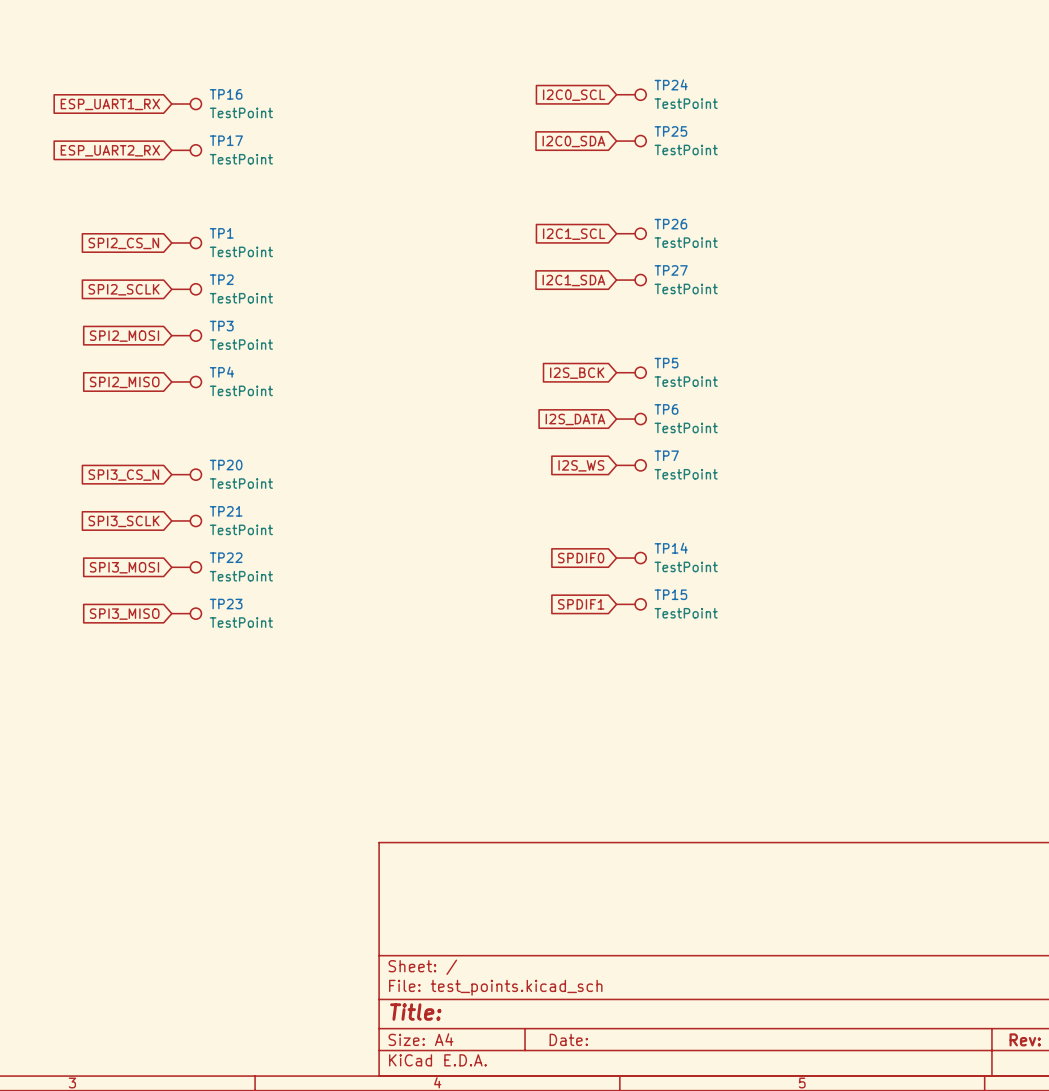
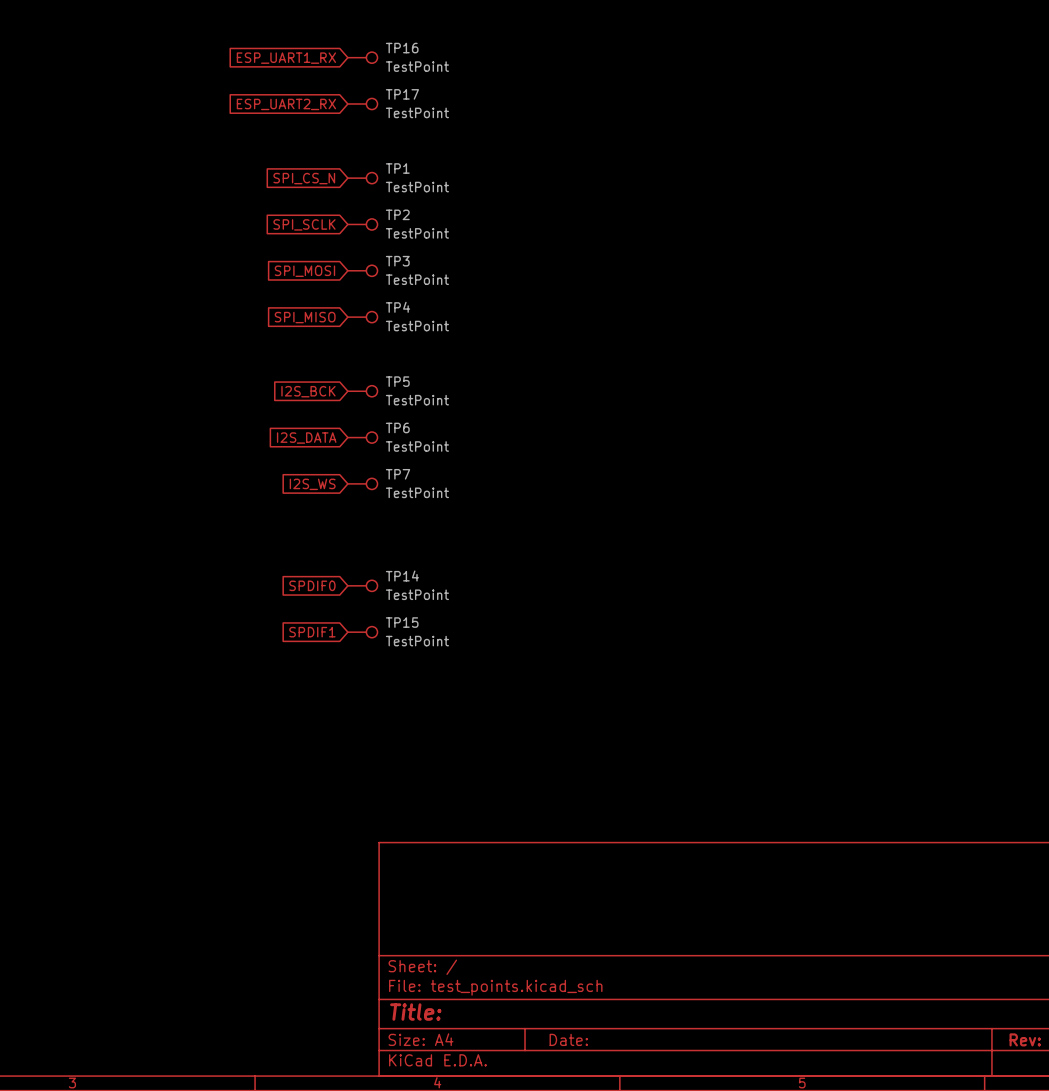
TP24: TestPoint (631, 94) -> none
global label: I2C0_SCL (574, 95) -> none
global label position: ESP_UART1_RX (110, 104) -> ESP_UART1_RX (286, 58)
TP16 position: (186, 104) -> (362, 57)
global label: I2C0_SDA (573, 141) -> none
TP25: TestPoint (631, 141) -> none
global label position: ESP_UART2_RX (110, 150) -> ESP_UART2_RX (286, 104)
TP17 position: (186, 150) -> (362, 104)
global label: none -> SPI_CS_N (304, 178)
global label: none -> SPI_SCLK (304, 224)
TP26: TestPoint (631, 233) -> none
global label: I2C1_SCL (574, 234) -> none
TP1 position: (186, 242) -> (362, 178)
global label: SPI2_CS_N (123, 243) -> none
global label: none -> SPI_MOSI (304, 271)
global label: I2C1_SDA (573, 280) -> none
TP27: TestPoint (631, 280) -> none
global label: SPI2_SCLK (124, 289) -> none
TP2 position: (186, 289) -> (362, 224)
global label: none -> SPI_MISO (305, 317)
TP3 position: (186, 335) -> (362, 270)
global label: SPI2_MOSI (124, 336) -> none
TP5 position: (631, 372) -> (362, 391)
global label: I2S_BCK (577, 373) -> none
TP4 position: (186, 381) -> (362, 317)
global label: SPI2_MISO (124, 382) -> none
global label: none -> I2S_BCK (308, 391)
global label: I2S_DATA (575, 419) -> none
TP6 position: (631, 419) -> (362, 437)
global label: none -> I2S_DATA (306, 438)
global label: I2S_WS (581, 465) -> none
TP7 position: (631, 465) -> (362, 483)
TP20: TestPoint (186, 474) -> none
global label: SPI3_CS_N (123, 475) -> none
global label: none -> I2S_WS (312, 484)
TP21: TestPoint (186, 520) -> none
global label: SPI3_SCLK (124, 521) -> none
global label: SPDIF0 (581, 558) -> none
TP14 position: (631, 558) -> (362, 585)
global label: SPI3_MOSI (124, 567) -> none
TP22: TestPoint (186, 567) -> none
global label: none -> SPDIF0 (312, 585)
global label: SPDIF1 (581, 604) -> none
TP15 position: (631, 604) -> (362, 632)
TP23: TestPoint (186, 613) -> none
global label: SPI3_MISO (124, 614) -> none
global label: none -> SPDIF1 (312, 632)

